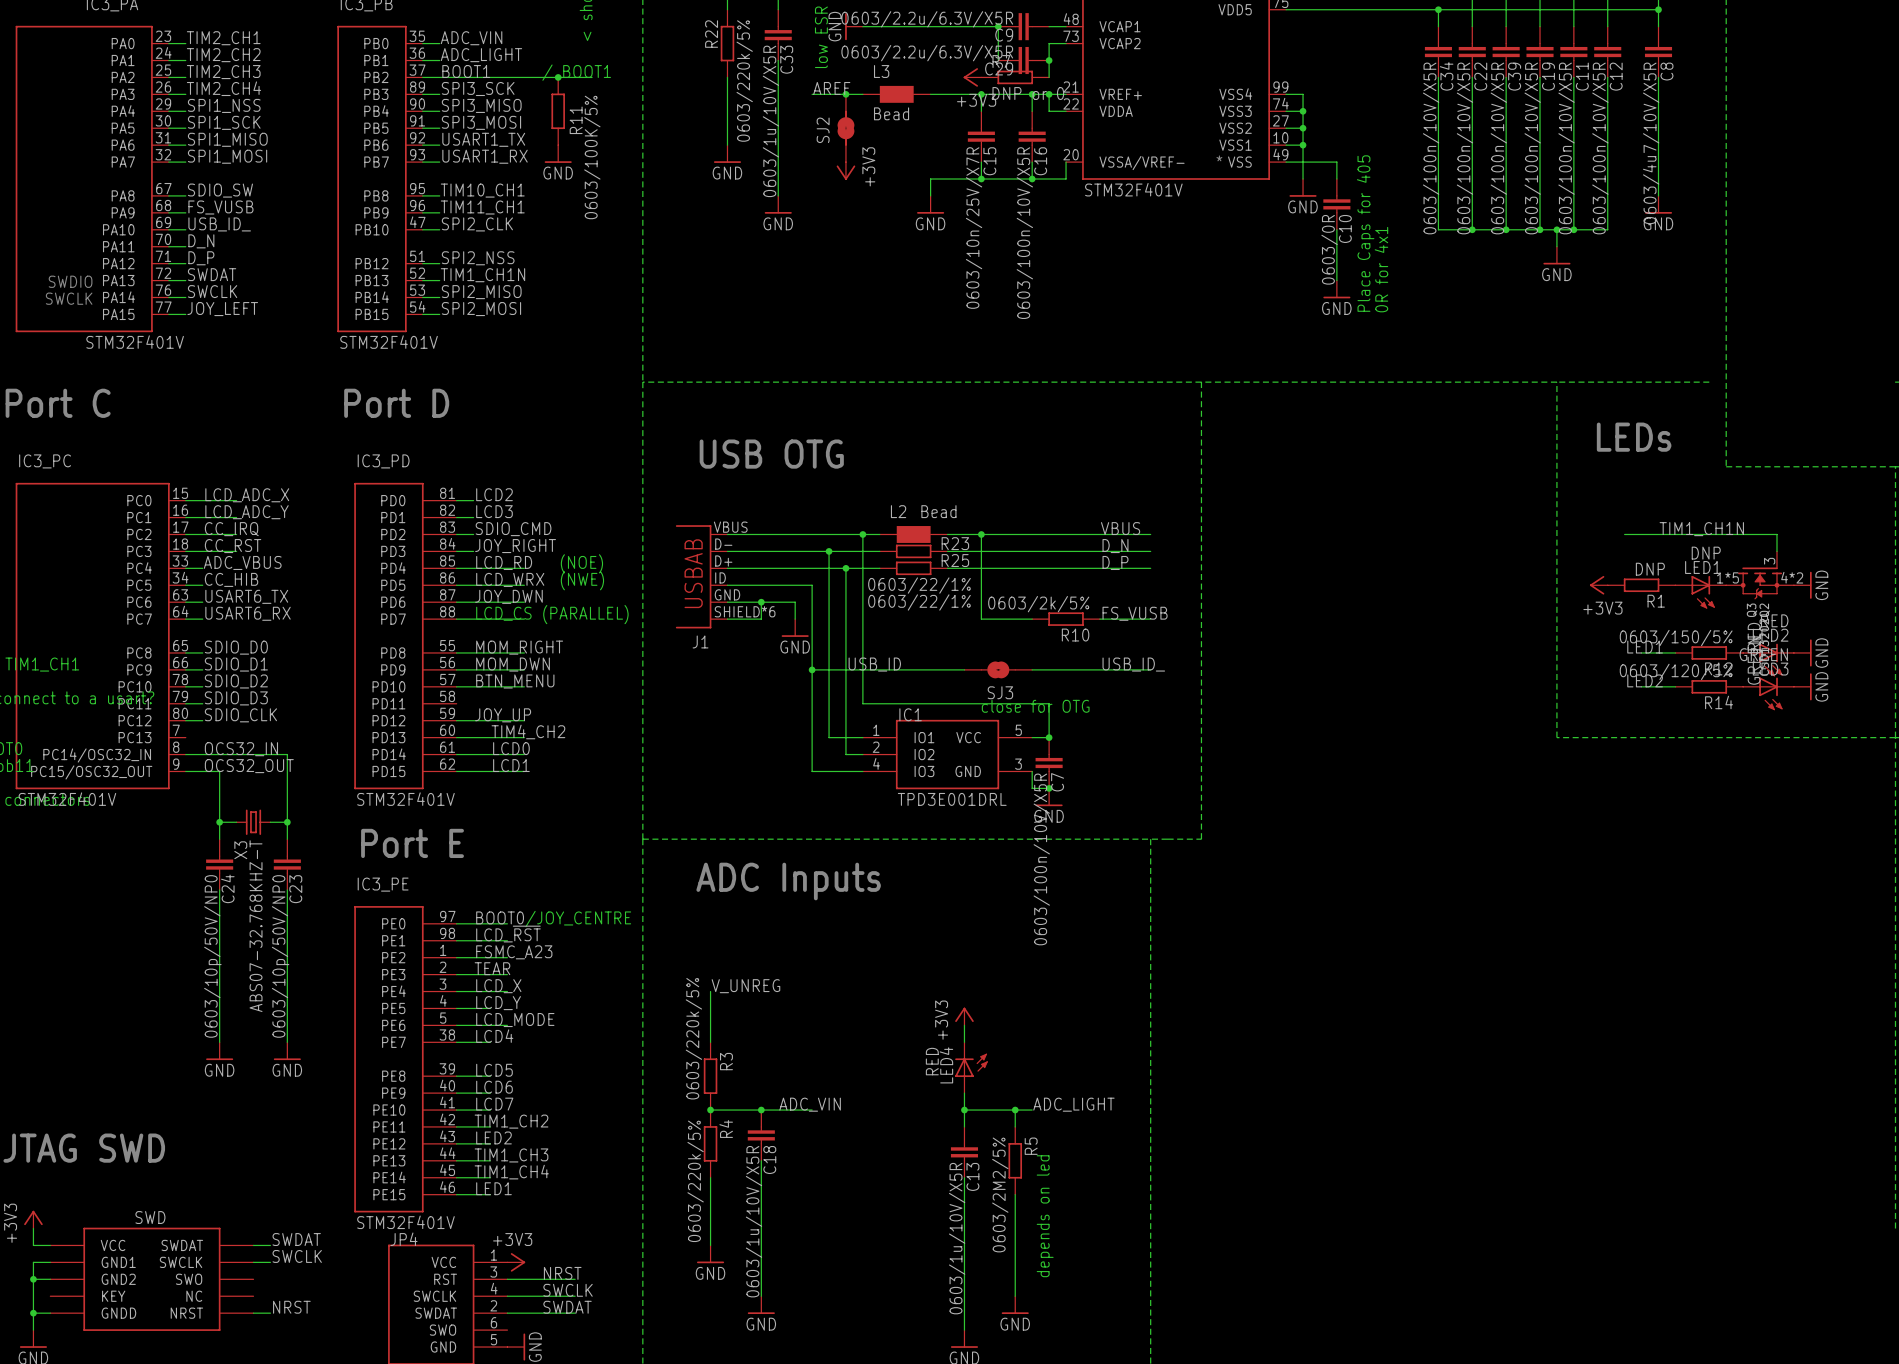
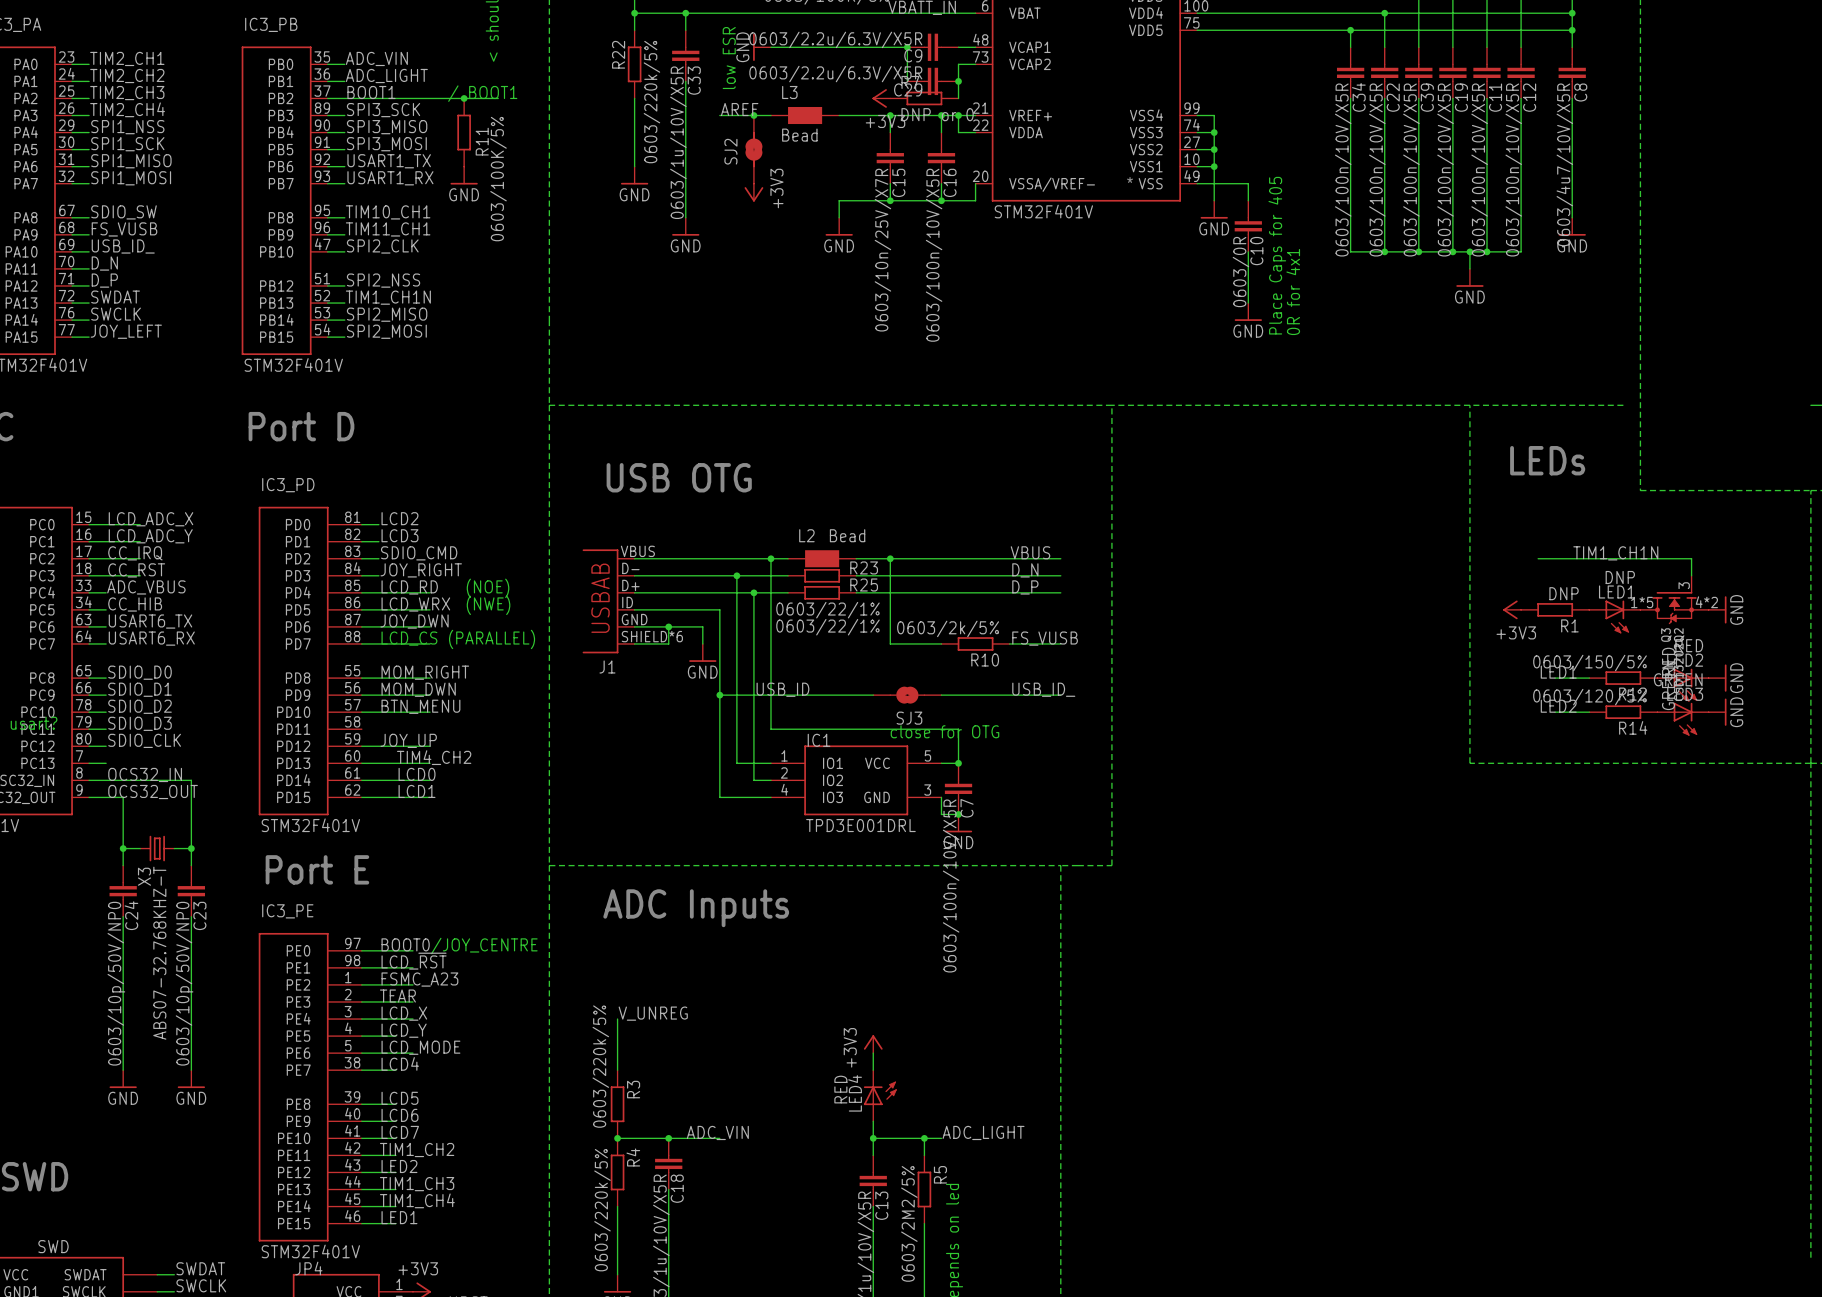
wire: none -> (89, 763) (106, 763)

